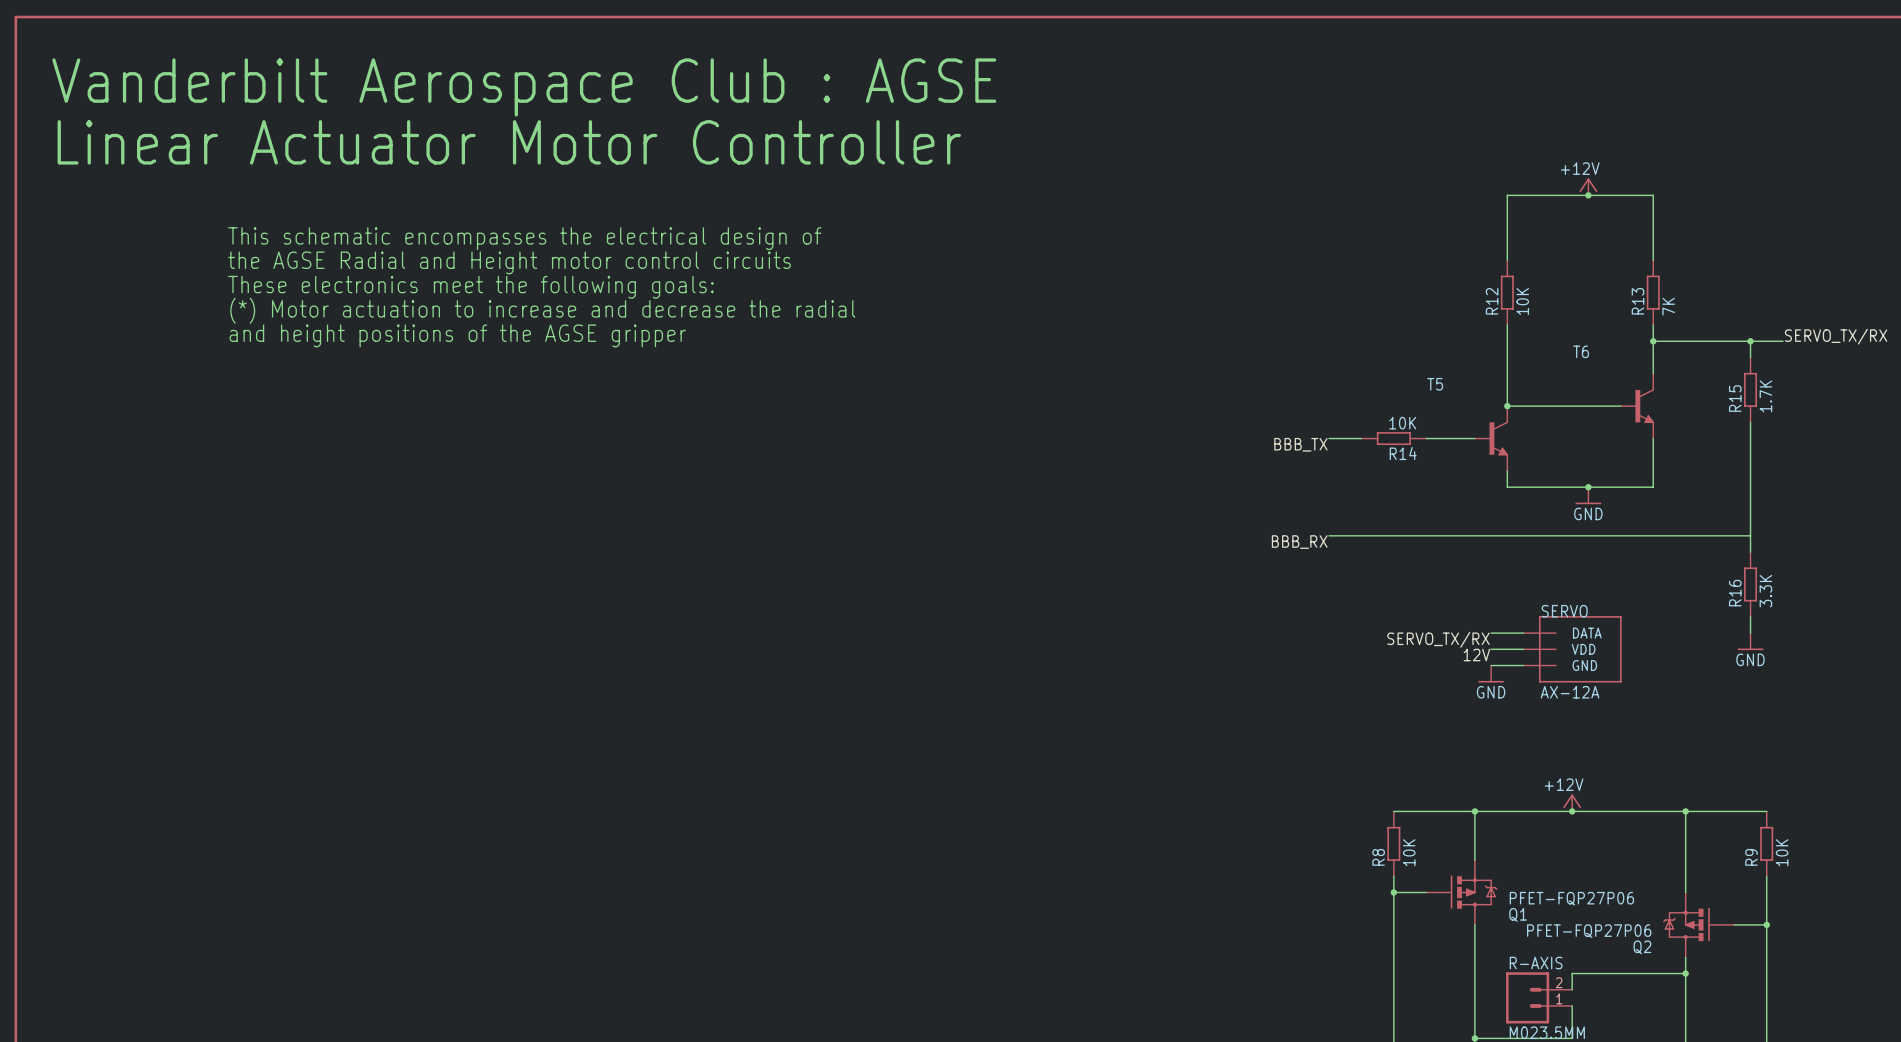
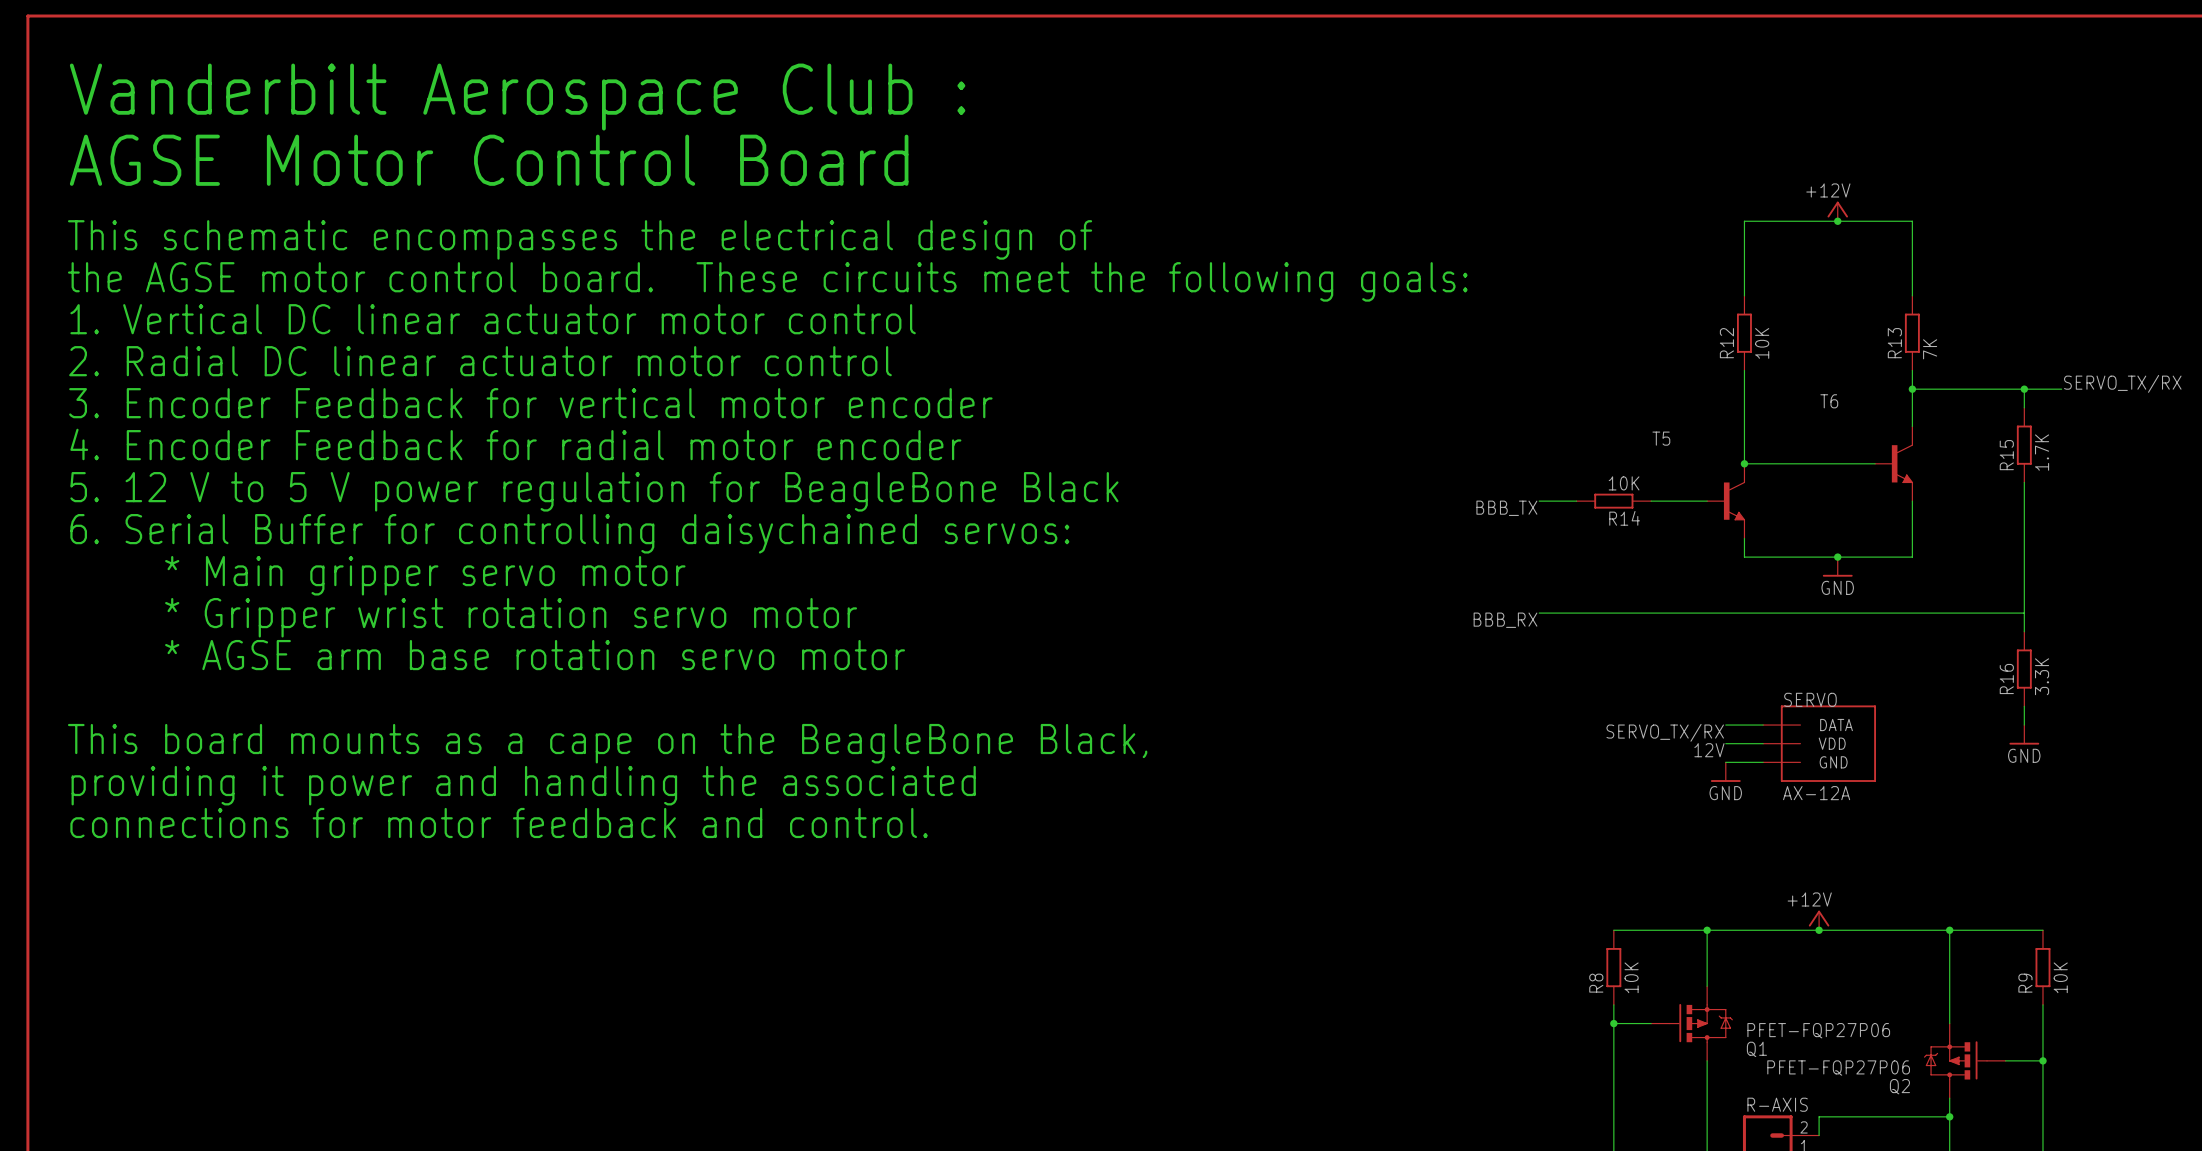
text: Vanderbilt Aerospace Club : AGSE (524, 87) -> Vanderbilt Aerospace Club : (517, 97)
text: Linear Actuator Motor Controller (509, 142) -> AGSE Motor Control Board (489, 160)
text: none -> This schematic encompasses the electrical design of (580, 239)
text: This schematic encompasses the electrical design of (524, 238) -> none
text: none -> the AGSE motor control board. These circuits meet the following goals: (767, 281)
text: the AGSE Radial and Height motor control circuits (509, 262) -> none
text: none -> 1. Vertical DC linear actuator motor control (493, 319)
text: These electronics meet the following goals: (470, 287) -> none
text: (*) Motor actuation to increase and decrease the radial (542, 310) -> none
text: none -> 2. Radial DC linear actuator motor control (480, 361)
text: and height positions of the AGSE gripper (457, 335) -> none
text: none -> 3. Encoder Feedback for vertical motor encoder (530, 403)
text: none -> 4. Encoder Feedback for radial motor encoder (515, 444)
text: none -> 5. 12 V to 5 V power regulation for BeagleBone Black (594, 491)
text: none -> 6. Serial Buffer for controlling daisychained servos: (569, 533)
text: none -> * Main gripper servo motor (425, 575)
text: none -> * Gripper wrist rotation servo motor (511, 617)
text: none -> * AGSE arm base rotation servo motor (535, 655)
text: none -> This board mounts as a cape on the BeagleBone Black, (607, 743)
text: none -> providing it power and handling the associated (523, 785)
text: none -> connections for motor feedback and control. (499, 822)

